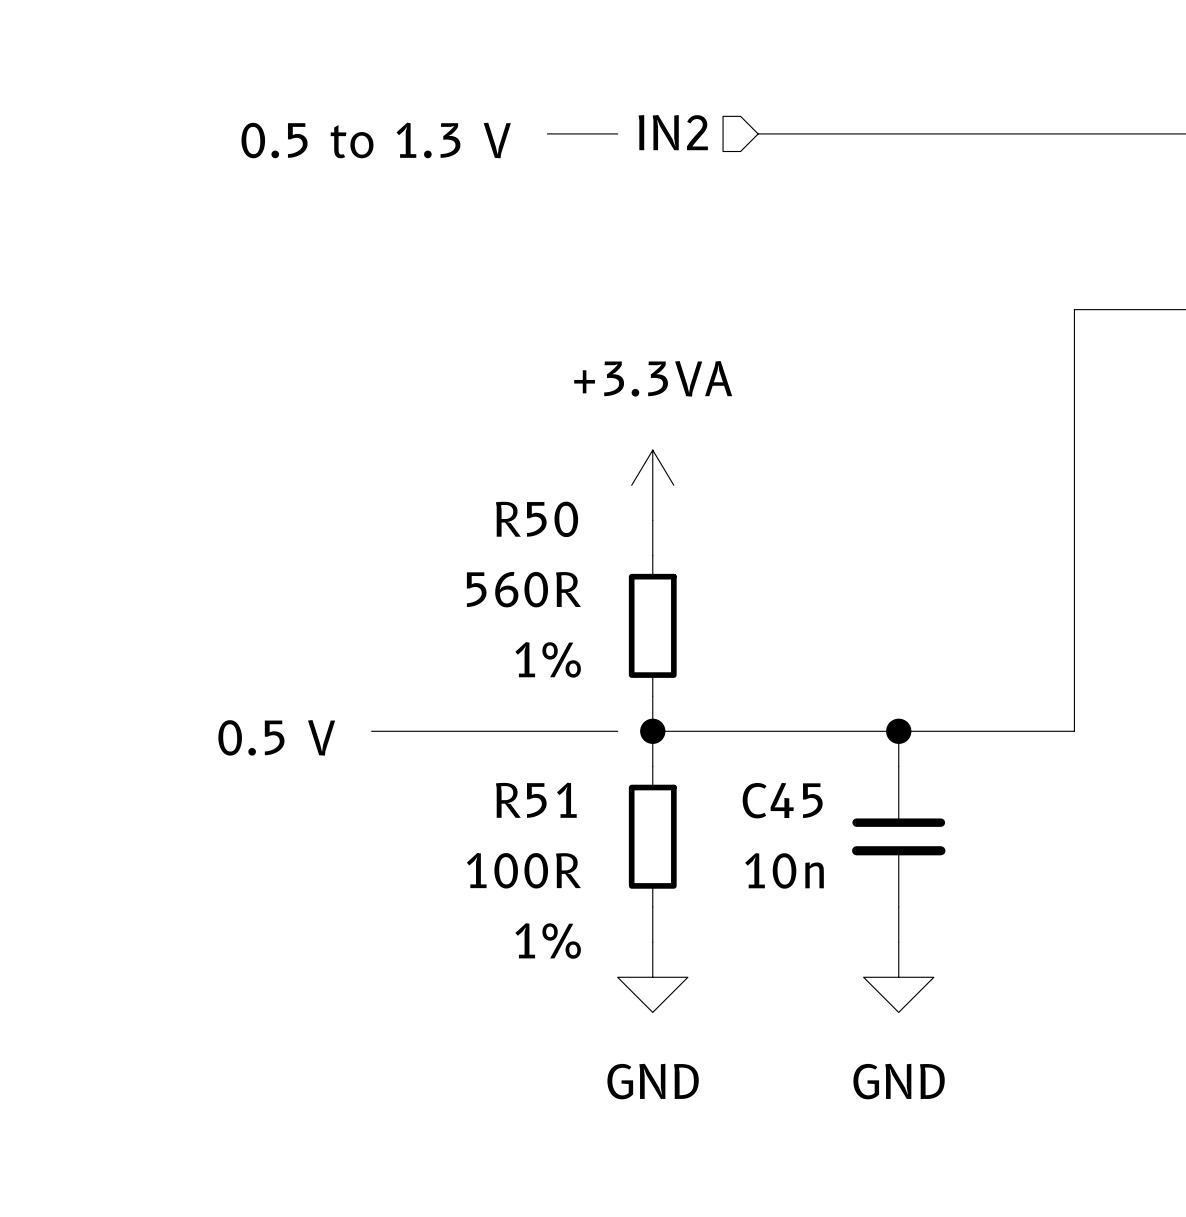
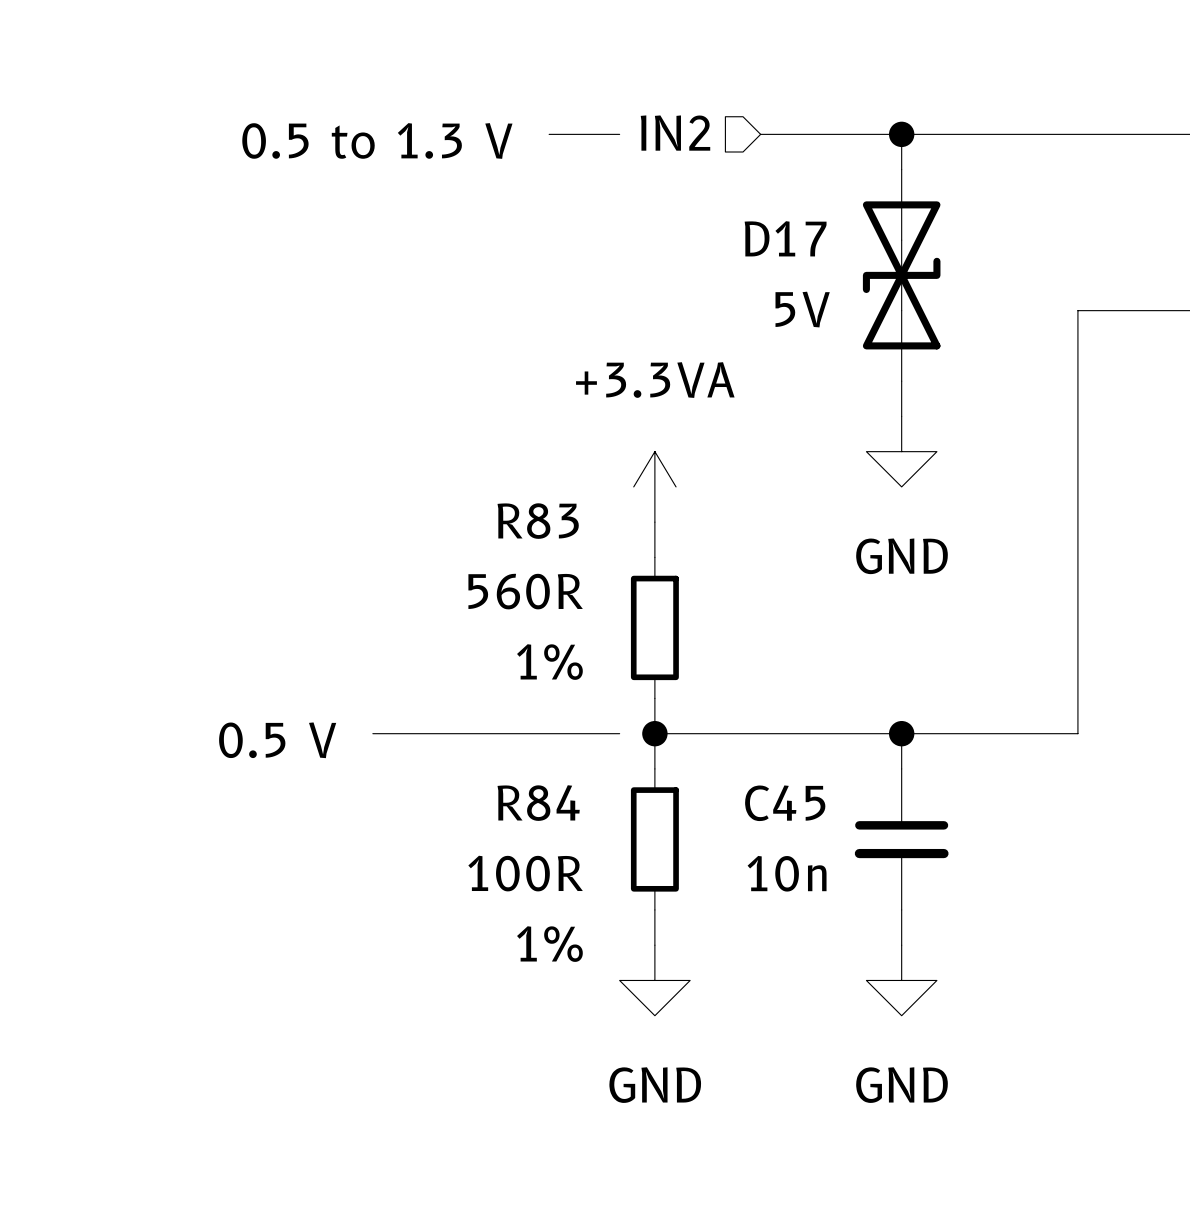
wire: none -> (901, 134) (901, 169)
junction: none -> (901, 134)
D17: none -> 5V (901, 275)
wire: none -> (901, 381) (901, 416)
power symbol: none -> GND (901, 451)
R50 name: R50 (537, 519) -> R83 (538, 521)
R51 name: R51 (536, 800) -> R84 (538, 803)

